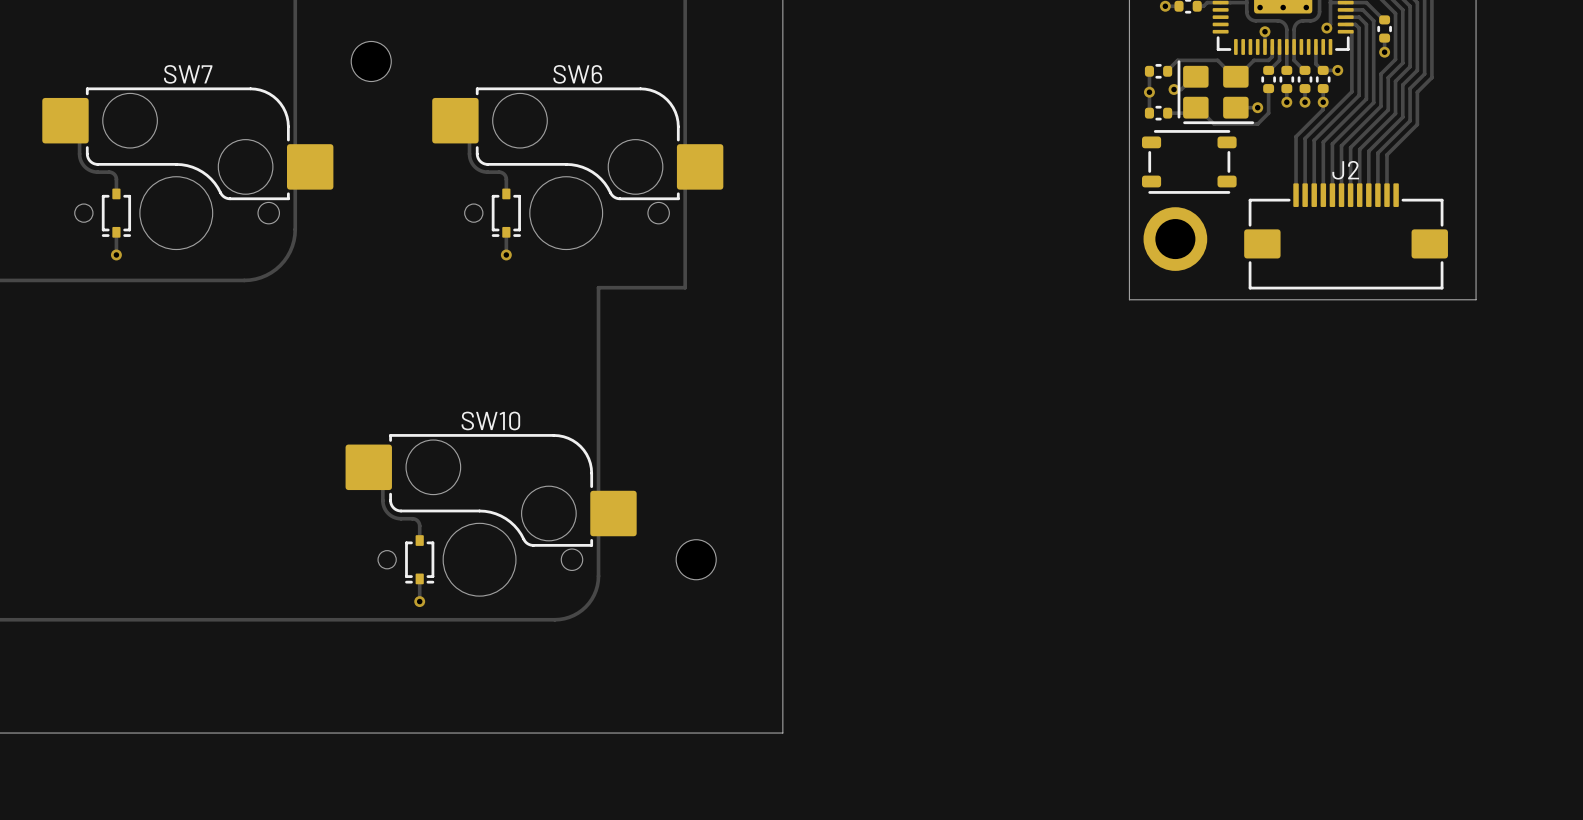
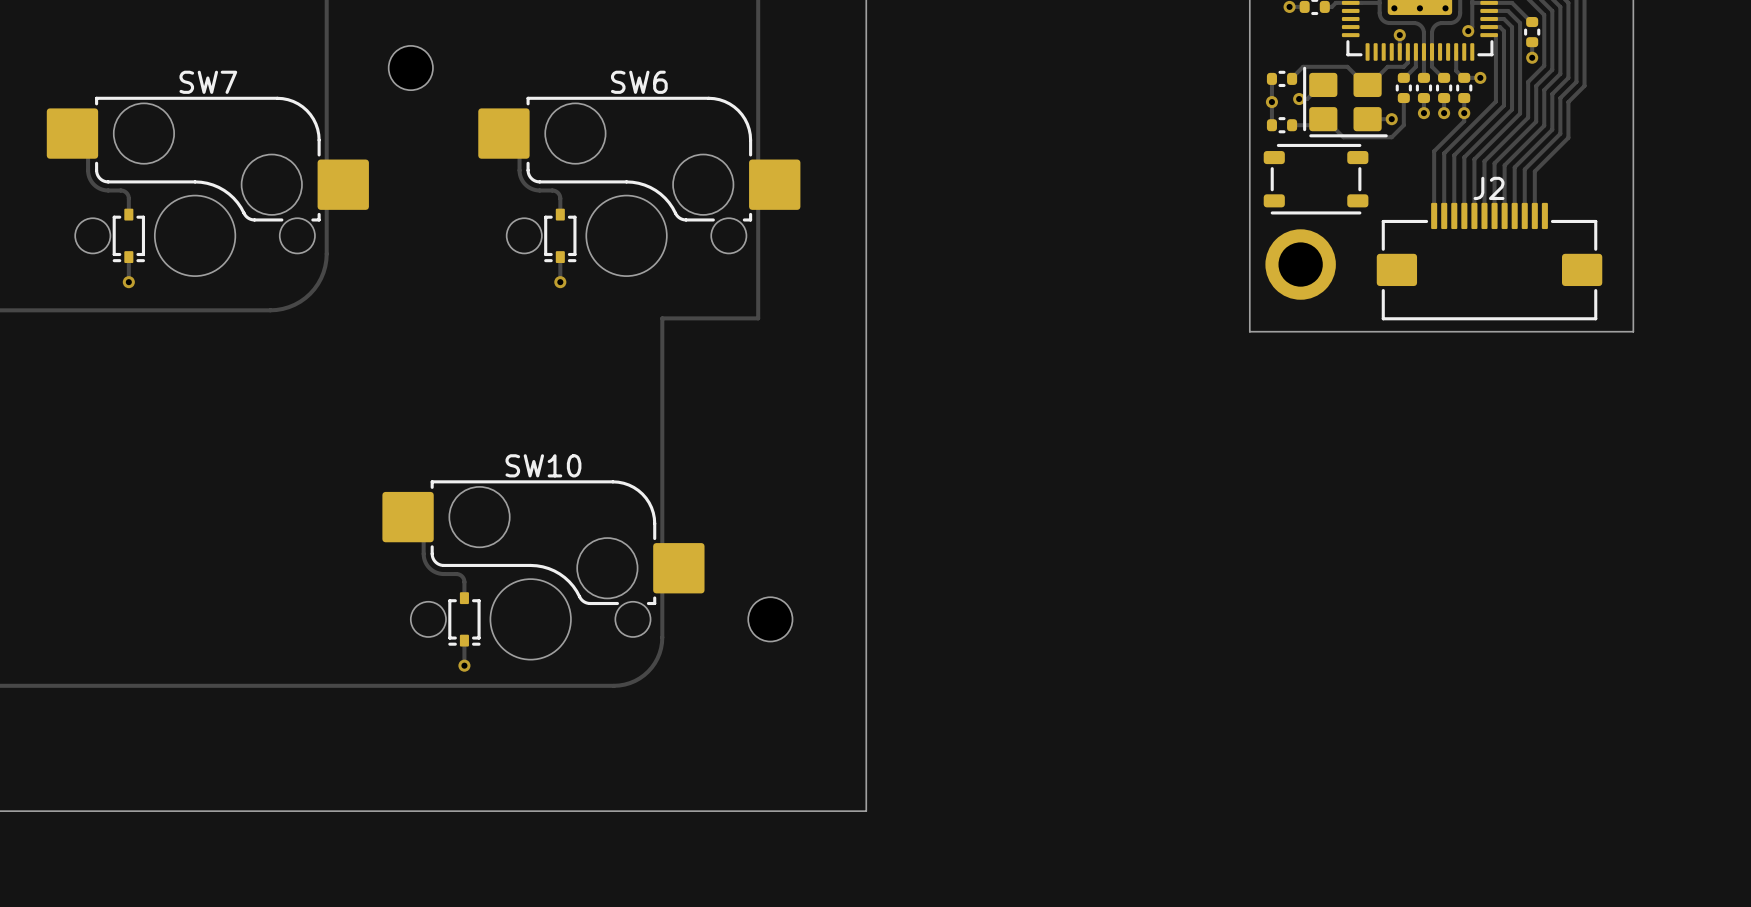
SW7 footprint: [42, 87, 334, 250] -> [46, 96, 369, 277]
SW6 footprint: [432, 87, 724, 250] -> [478, 96, 801, 277]
SW10 footprint: [345, 434, 637, 597] -> [382, 480, 705, 661]

